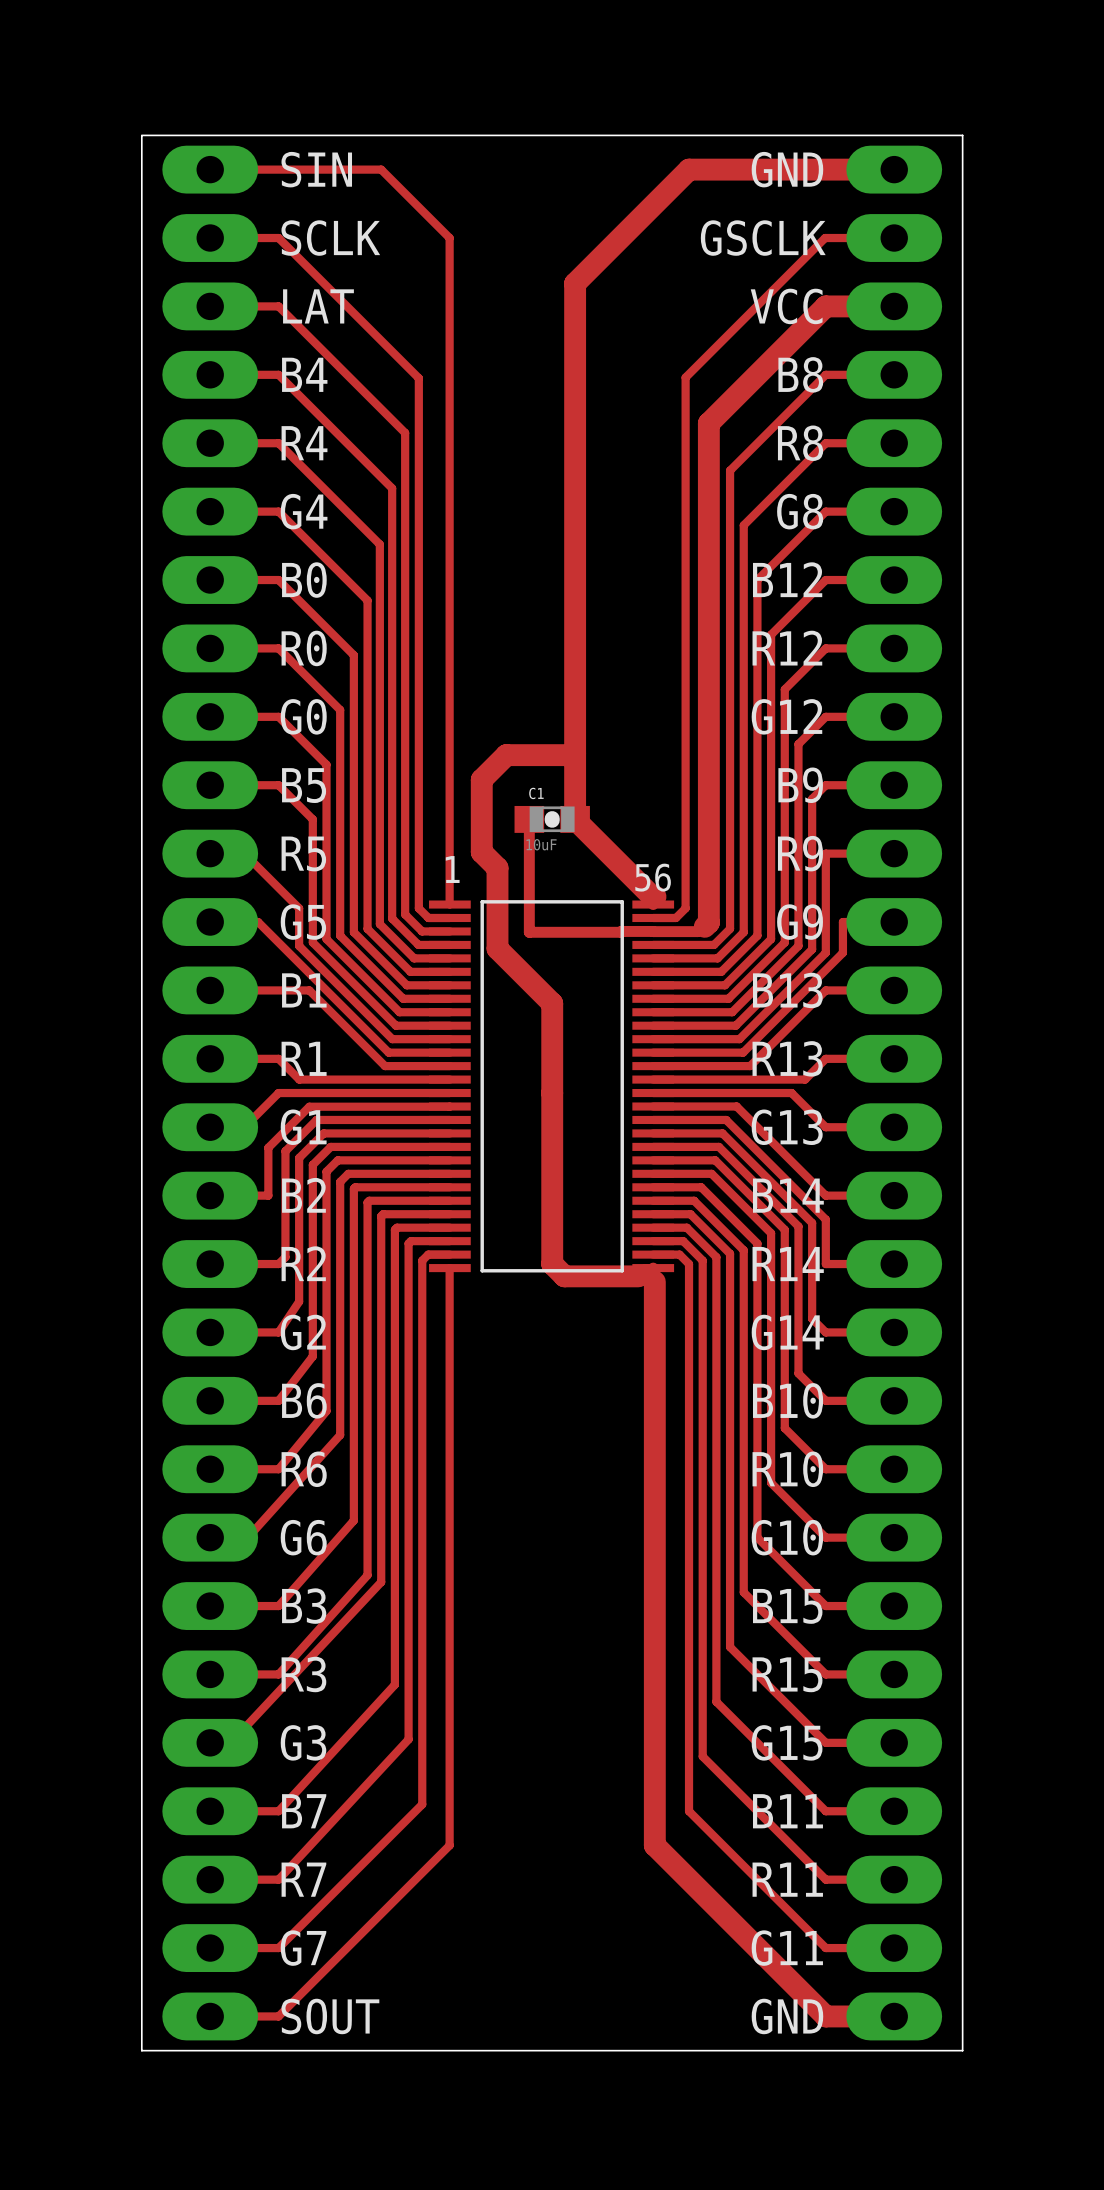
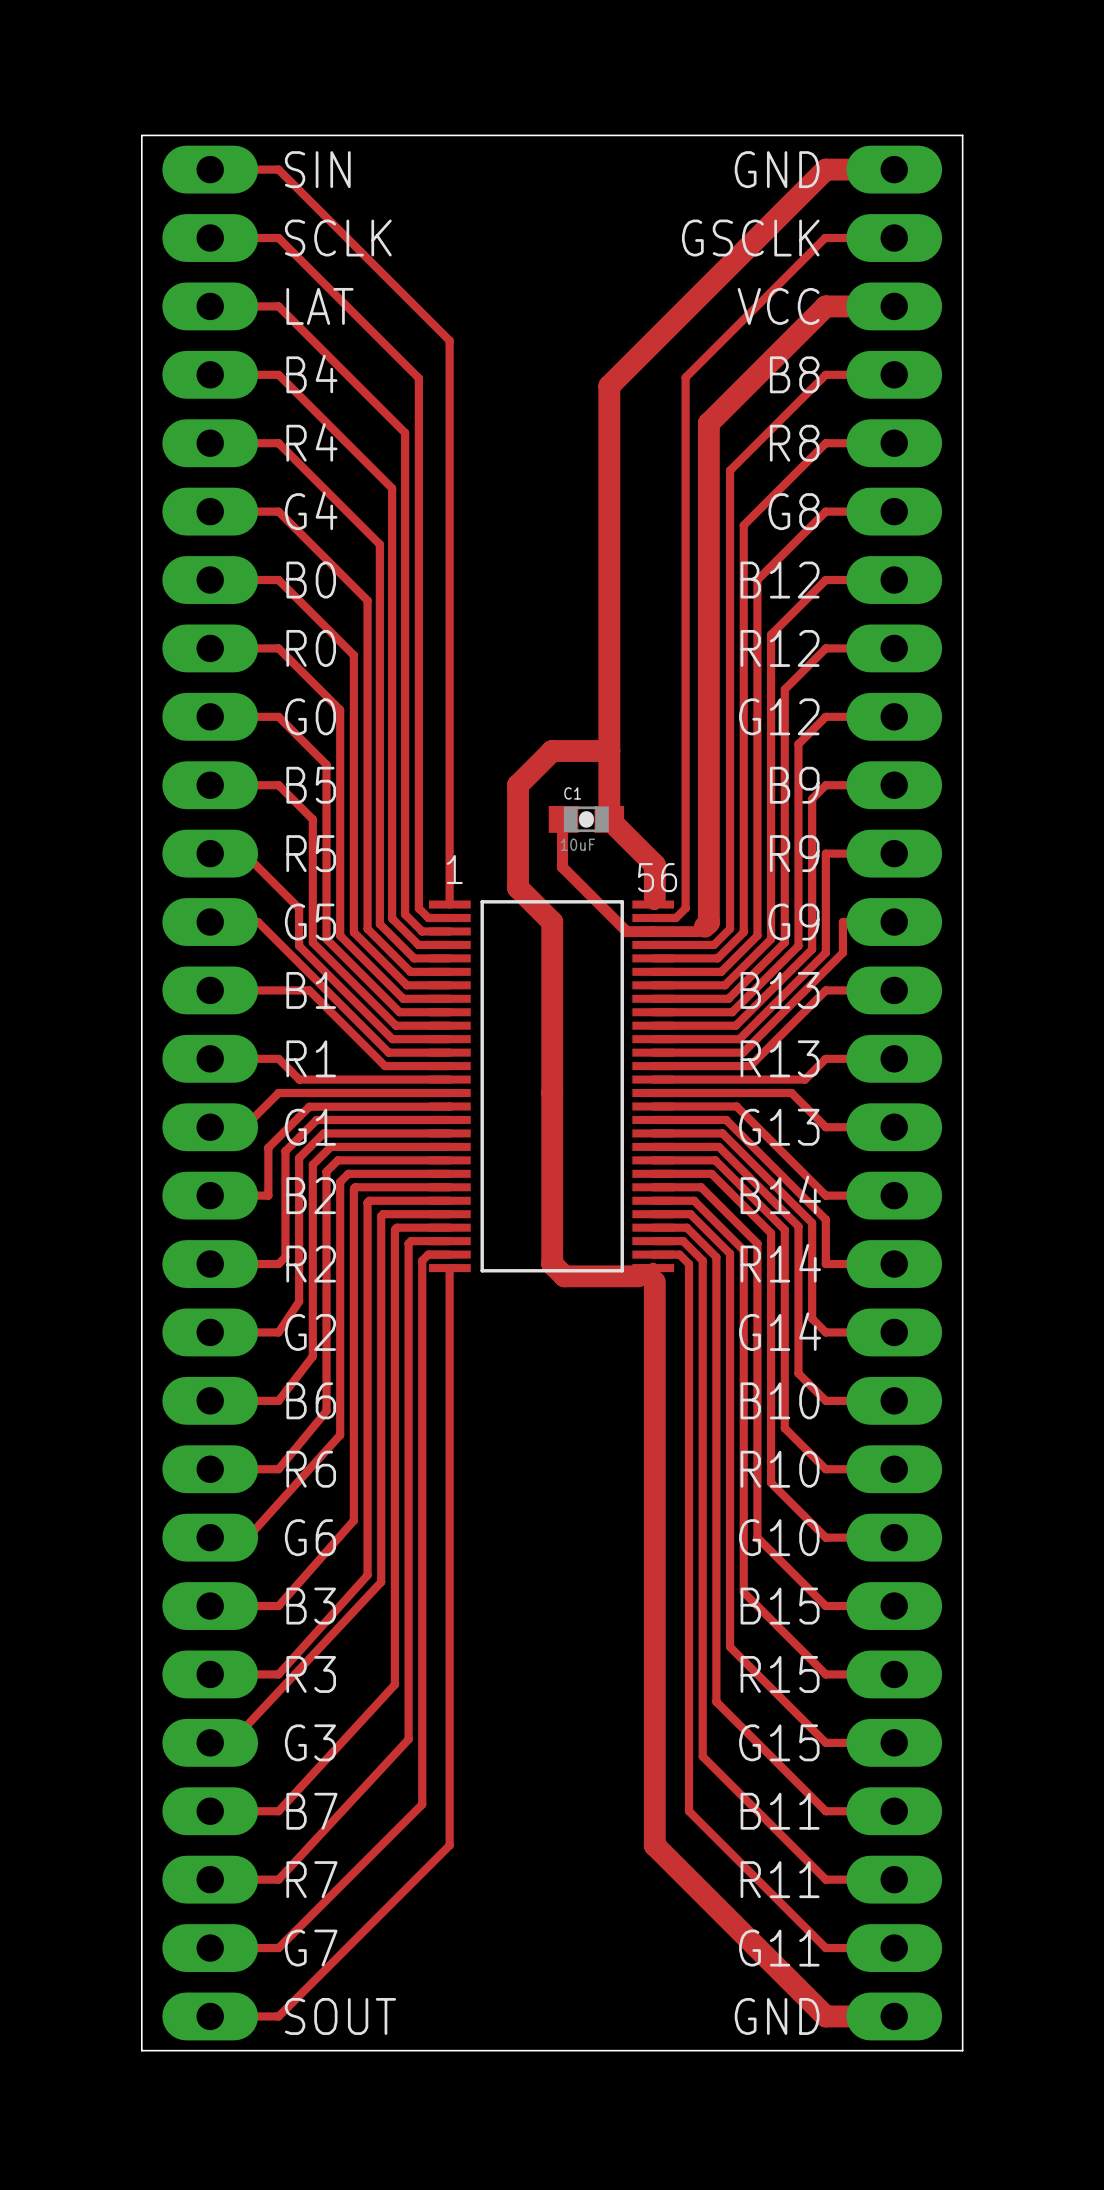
top track: (278, 169) (381, 169) (449, 238) (449, 340) -> (278, 169) (449, 340)
top track: (825, 169) (689, 169) (575, 283) (575, 819) (652, 896) (655, 896) (653, 899) (653, 904) -> (825, 169) (609, 386) (609, 819) (654, 864) (654, 904) (653, 904)
top track: (575, 753) (506, 755) (481, 779) (481, 852) (497, 867) (497, 948) (552, 1003) -> (609, 751) (552, 751) (518, 785) (518, 887) (552, 922) (552, 1003)
top track: (529, 819) (529, 932) (653, 931) -> (563, 819) (562, 867) (626, 931) (653, 931)
C1 position: (552, 819) -> (586, 819)

